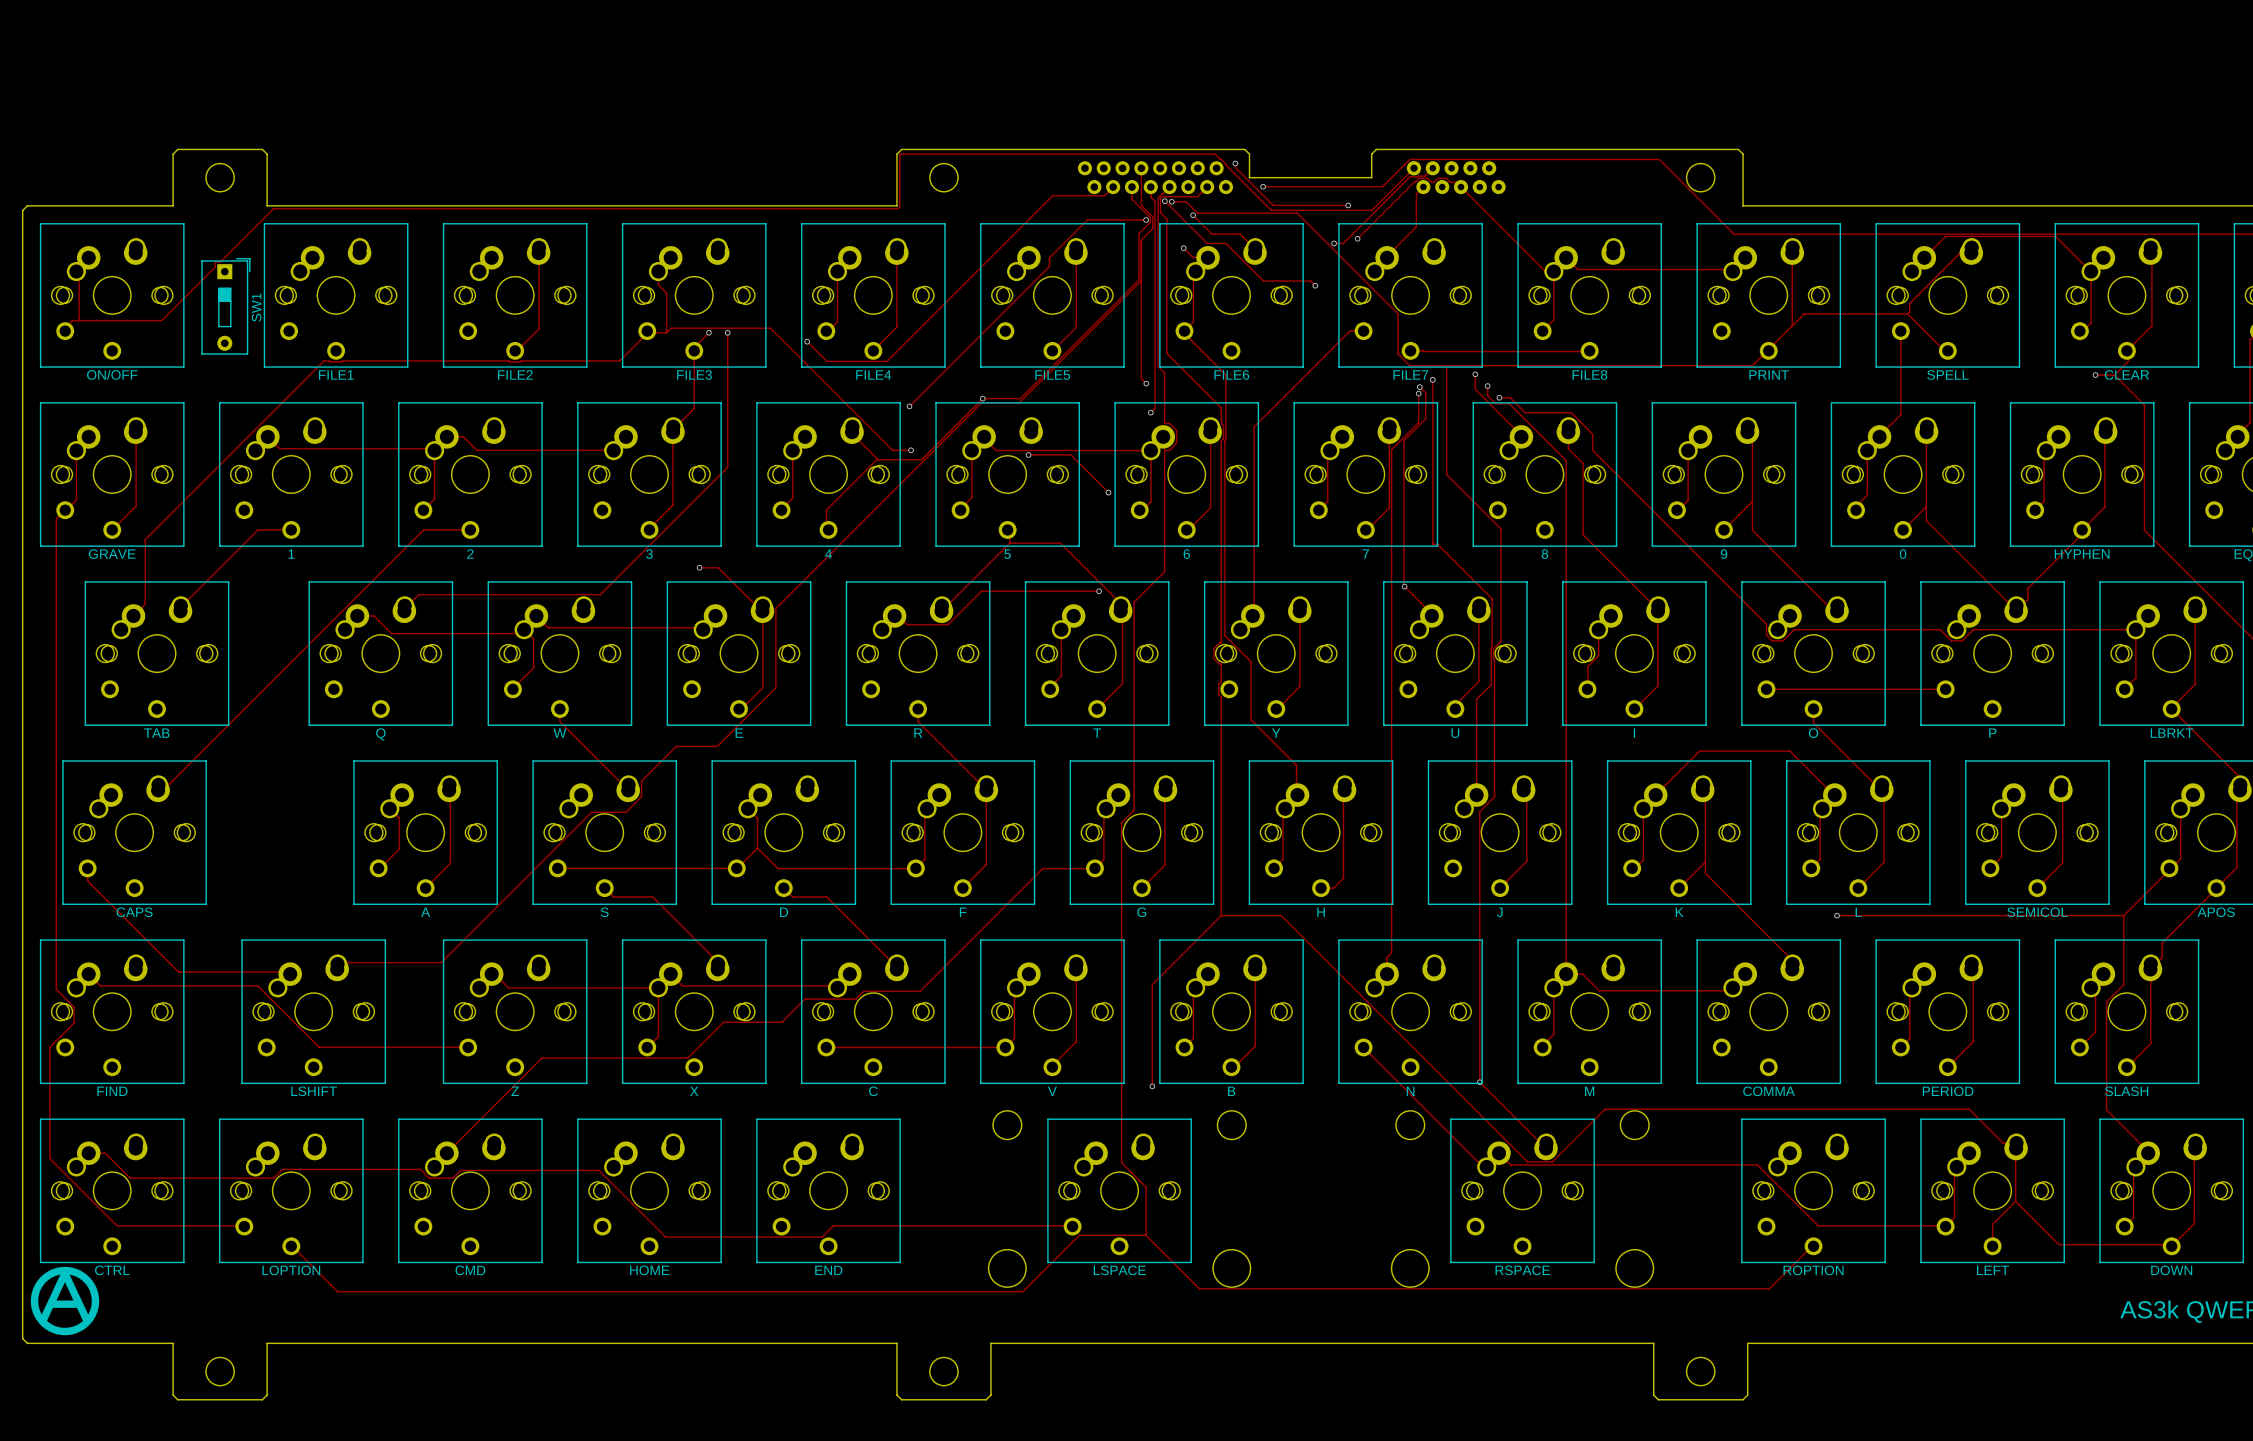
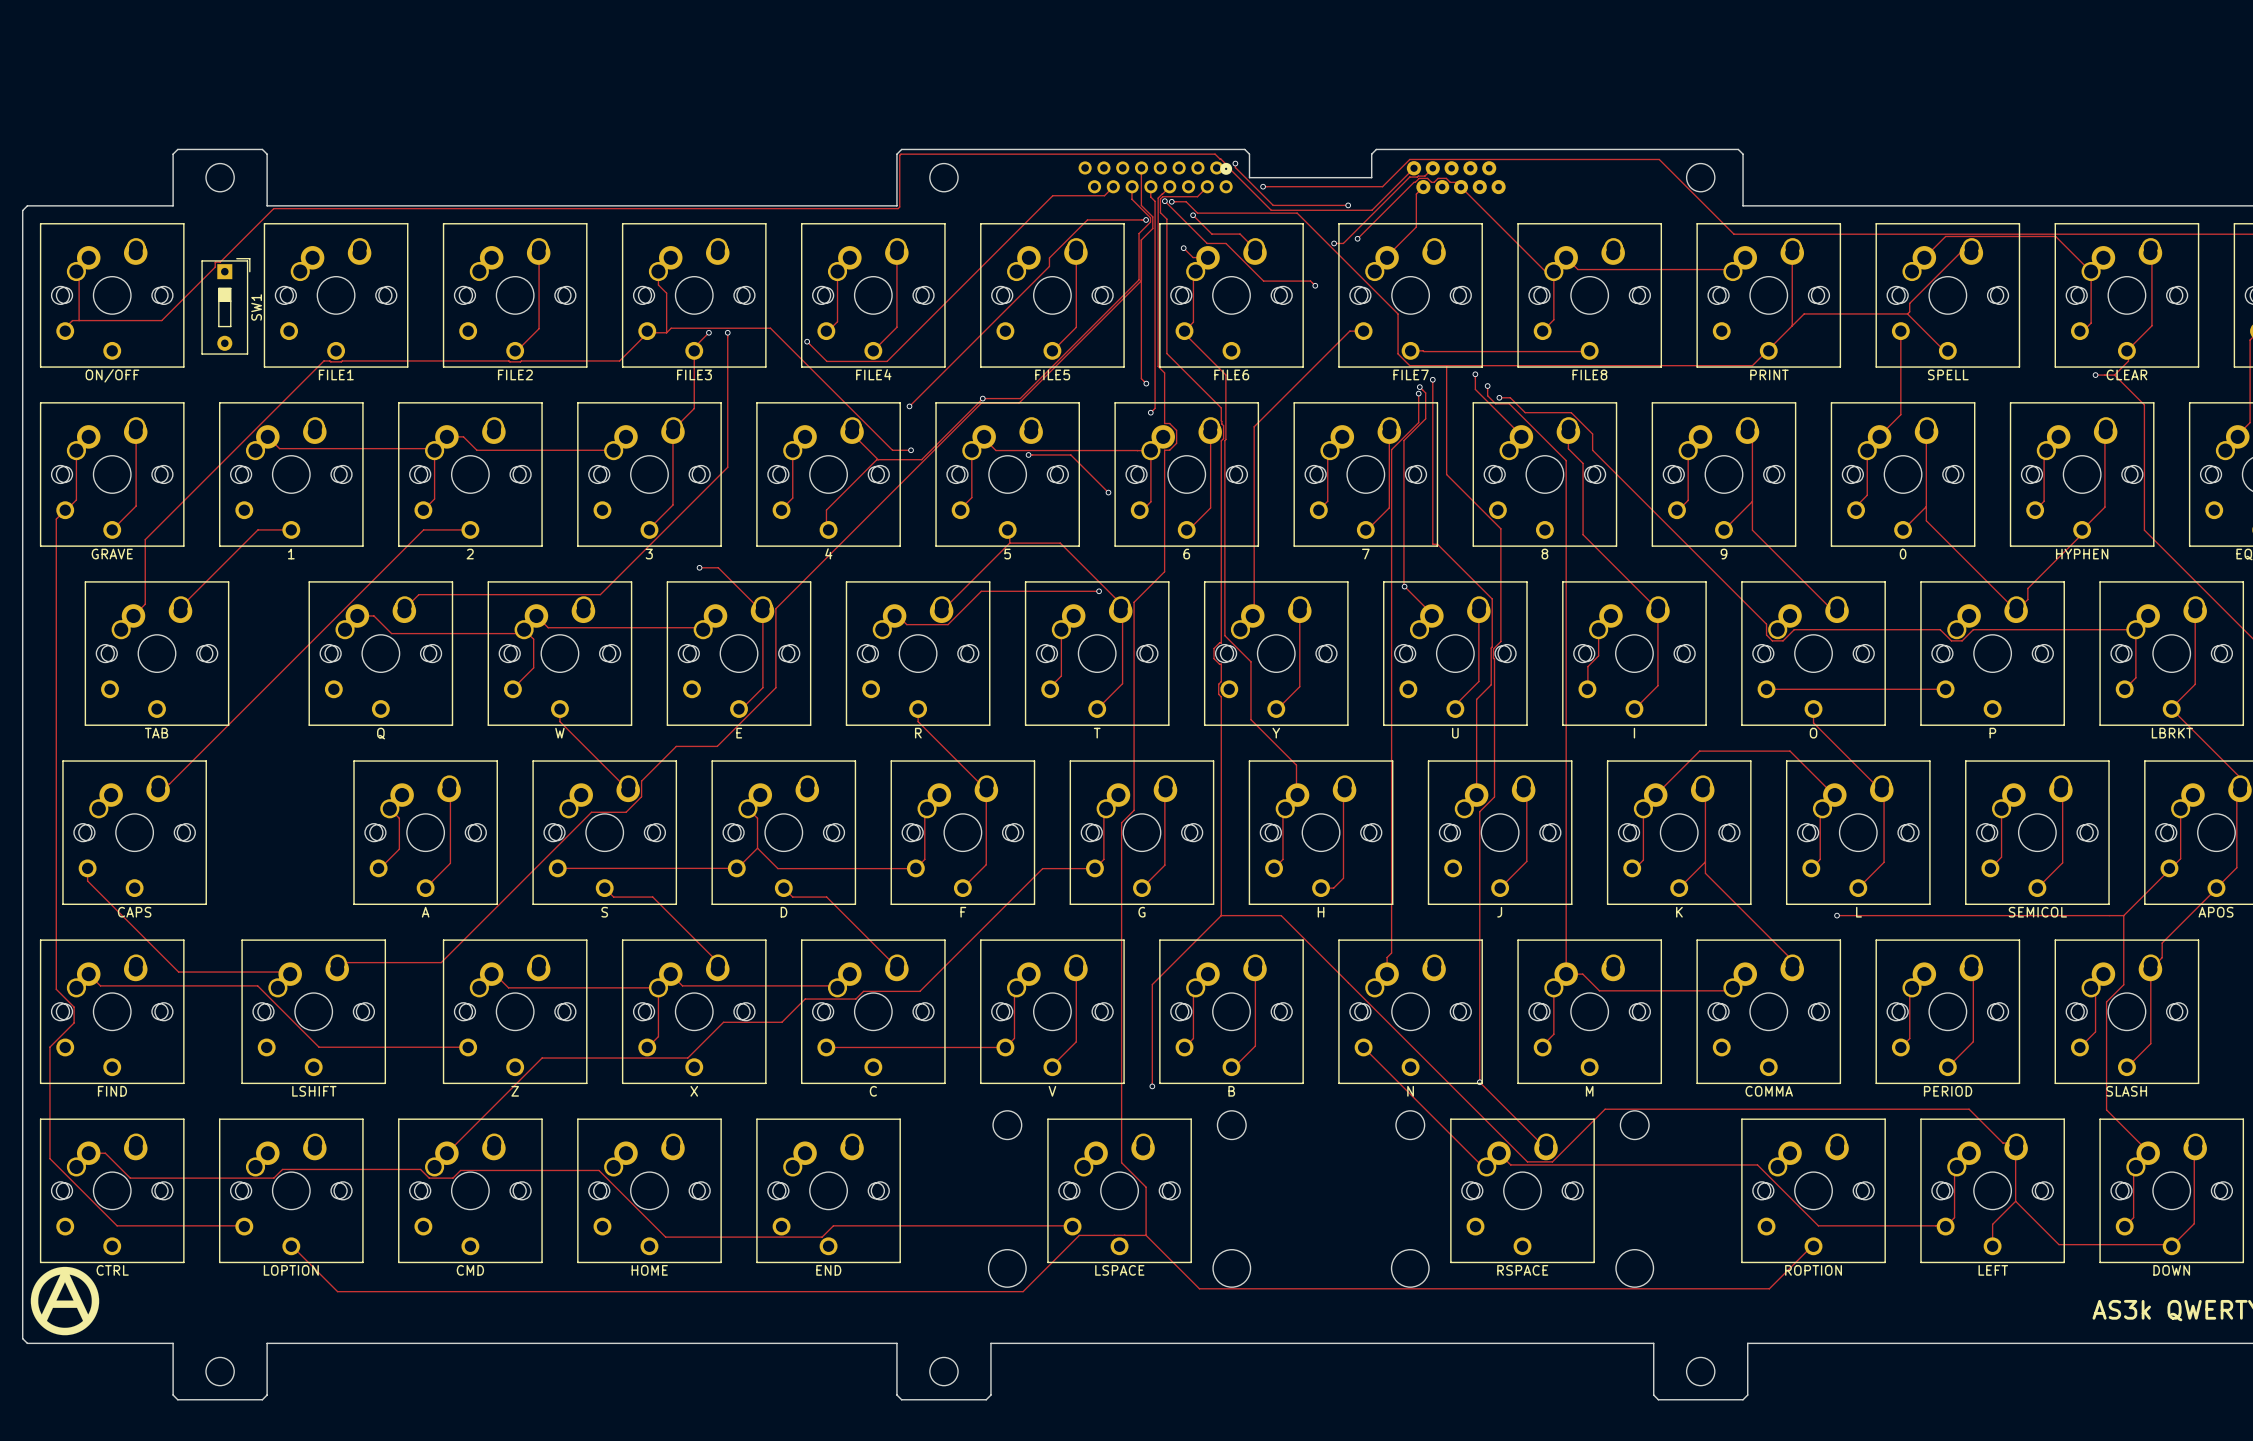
part footprint: [1077, 161, 1234, 195] -> [1078, 161, 1233, 194]

